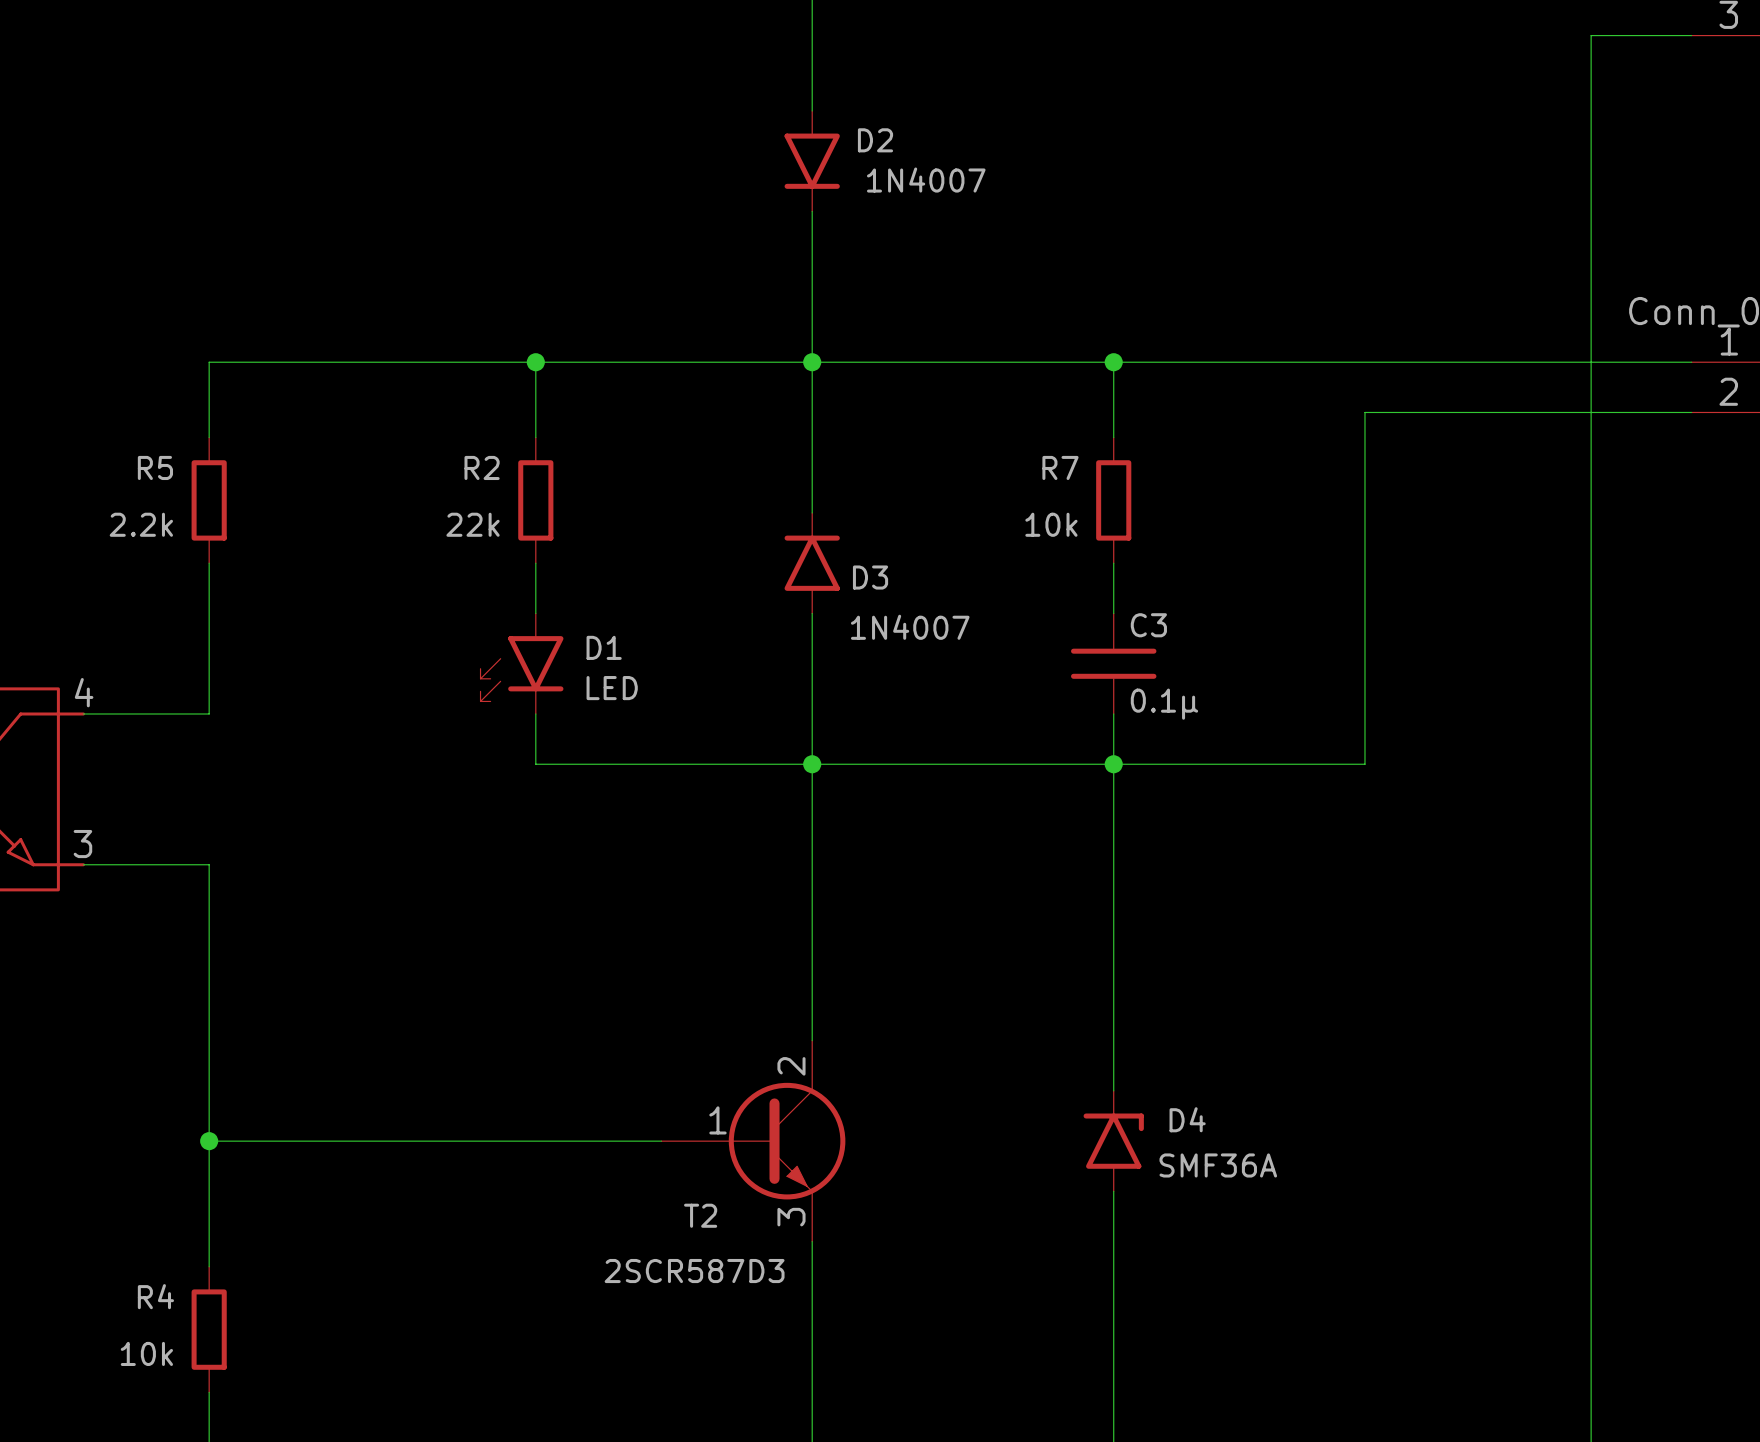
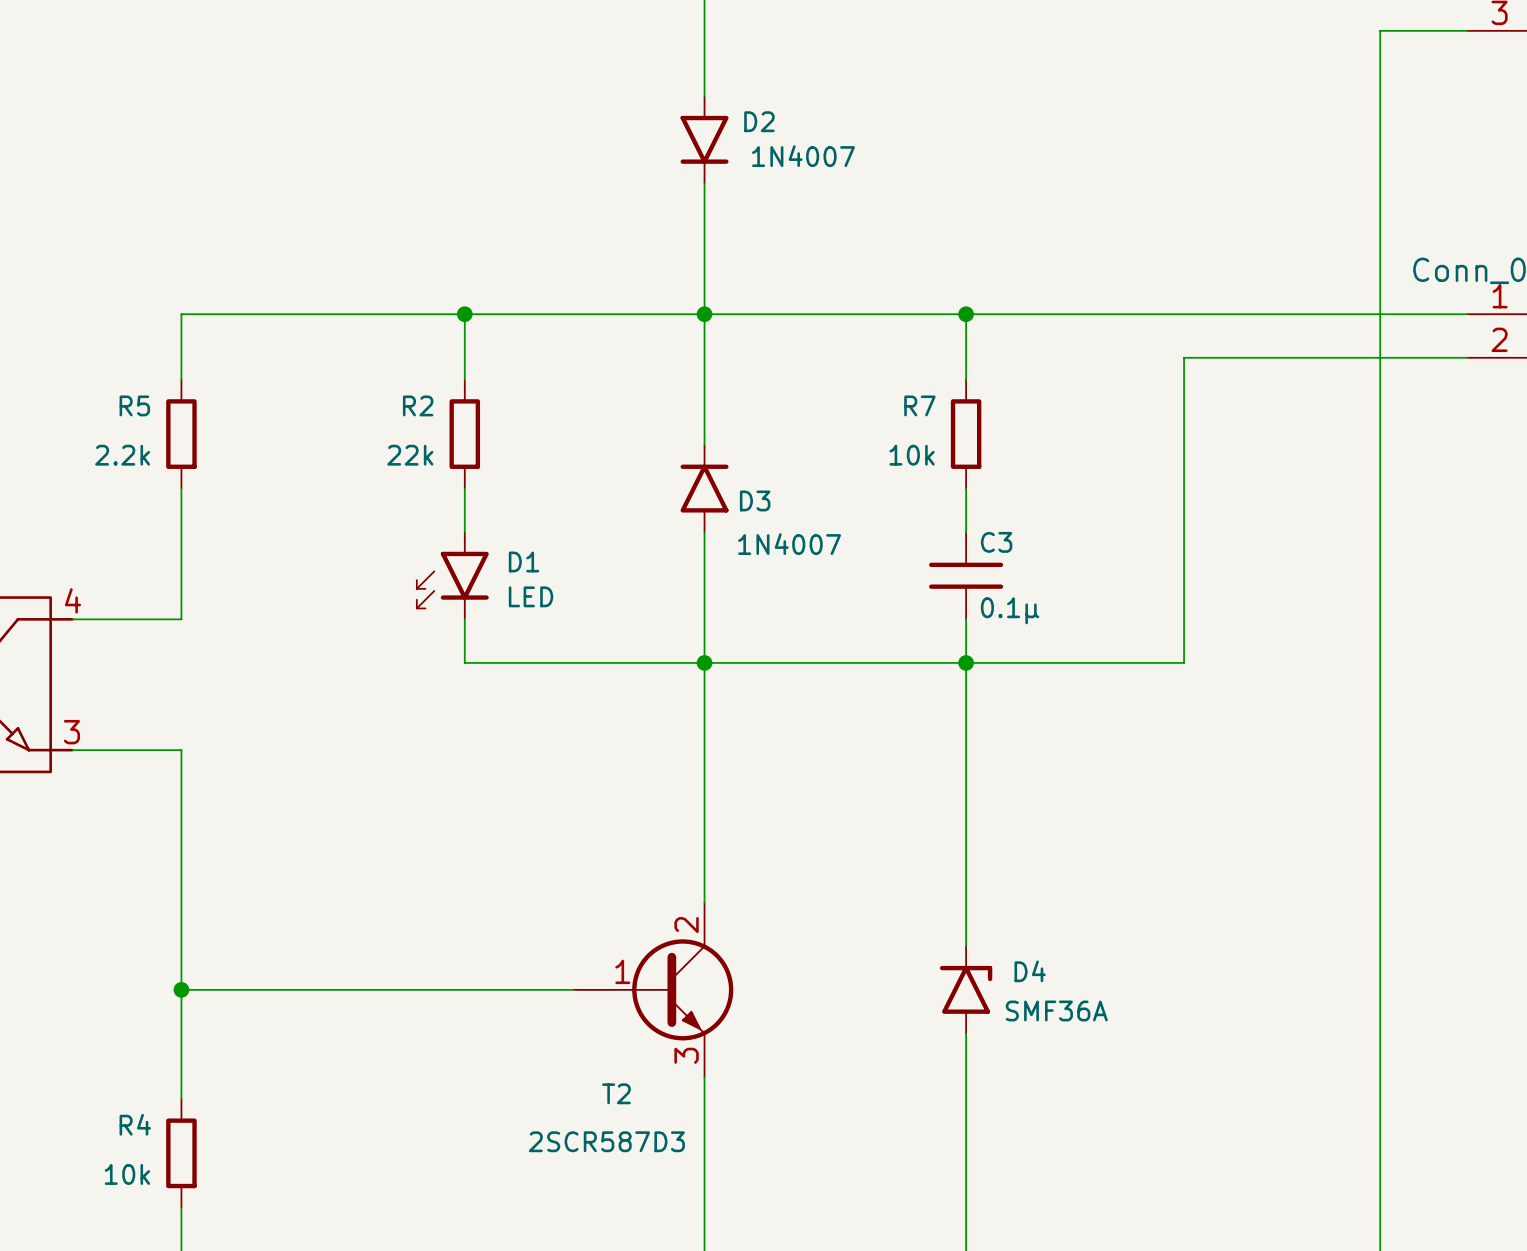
T2 name position: T2 (700, 1215) -> T2 (616, 1093)
T2 value position: 2SCR587D3 (694, 1271) -> 2SCR587D3 (606, 1141)

